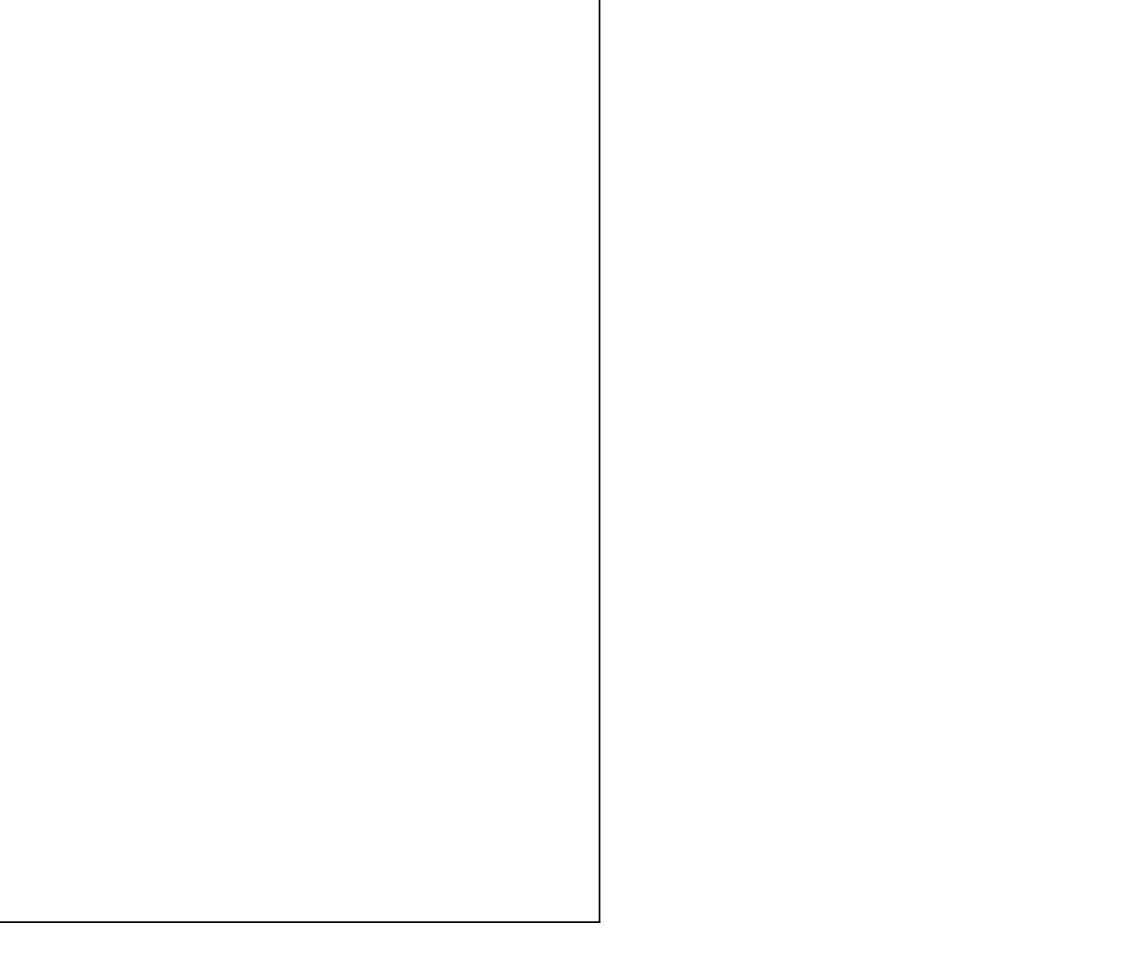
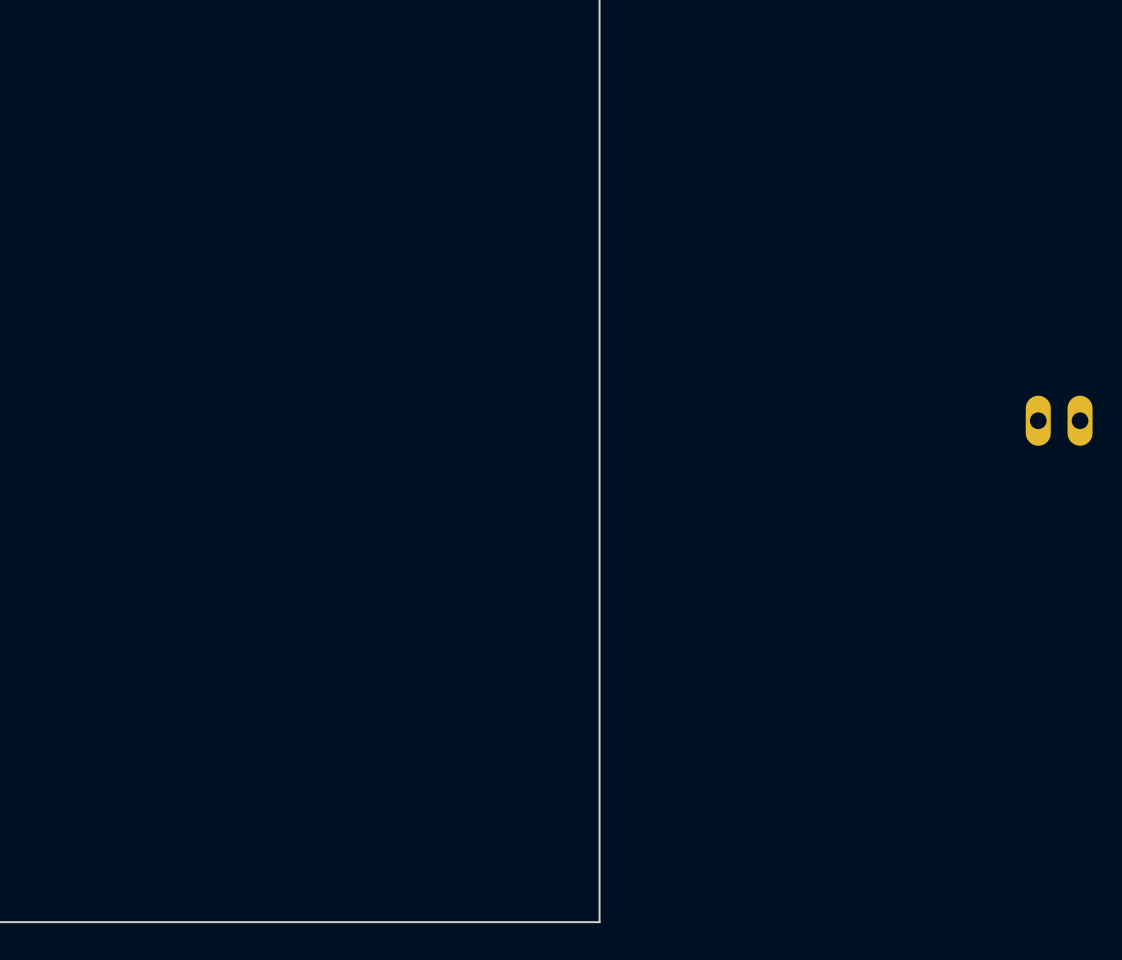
part: none -> (1059, 420)

